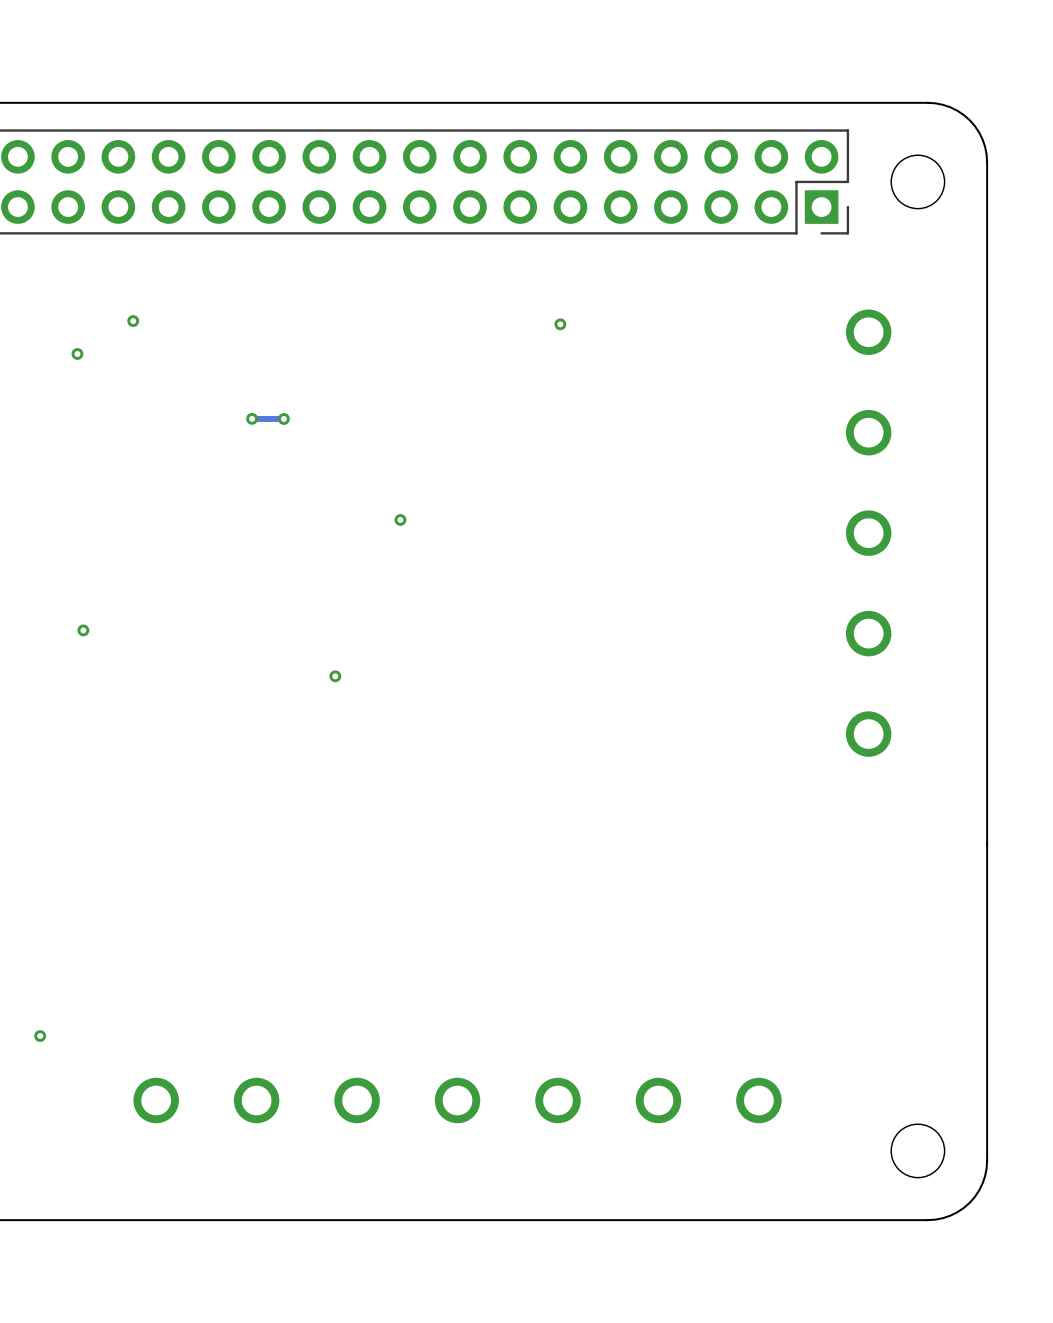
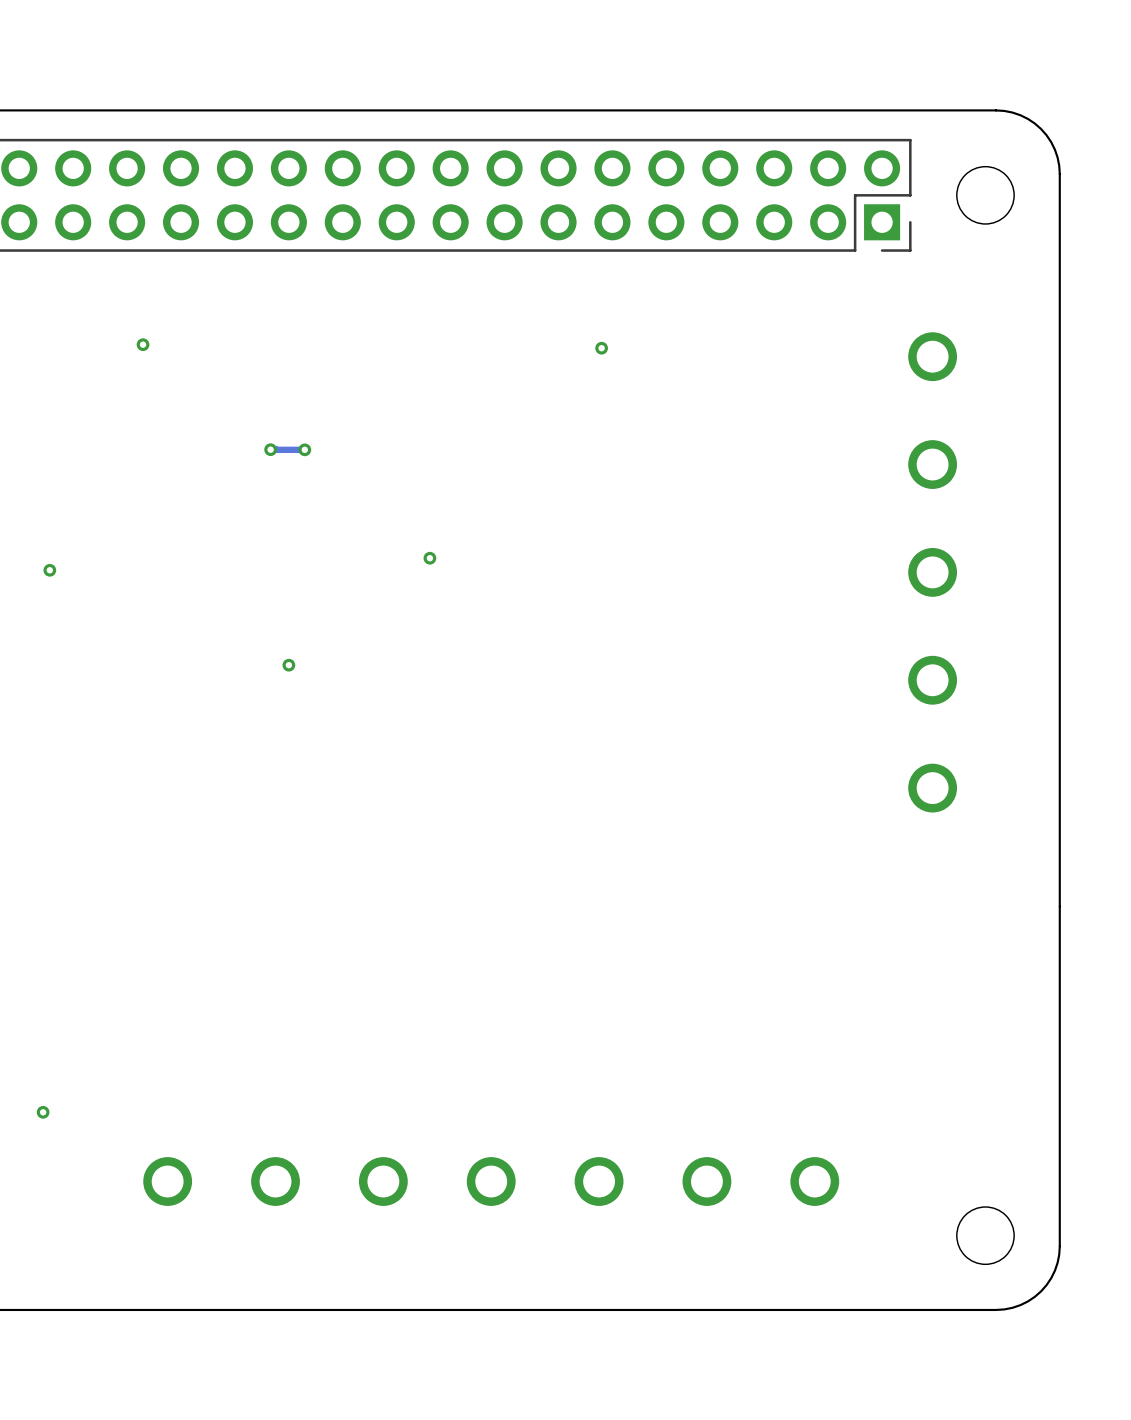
via: (77, 353) -> none
via: none -> (49, 570)
via: (83, 630) -> none
via position: (335, 676) -> (288, 665)

